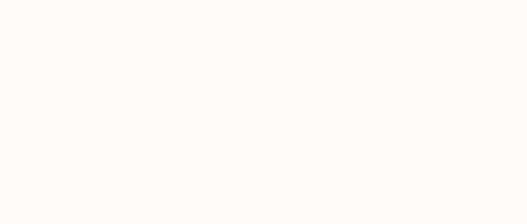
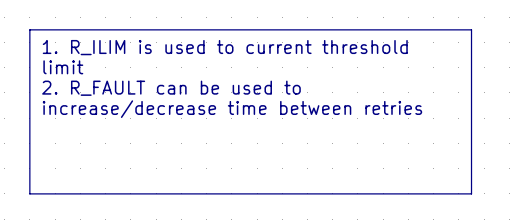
line: none -> (29, 29) (471, 29) (471, 193) (29, 193) (29, 29)
text: none -> 1. R_ILIM is used to current threshold (225, 47)
text: none -> limit (63, 67)
text: none -> 2. R_FAULT can be used to (171, 88)
text: none -> increase/decrease time between retries (232, 109)

